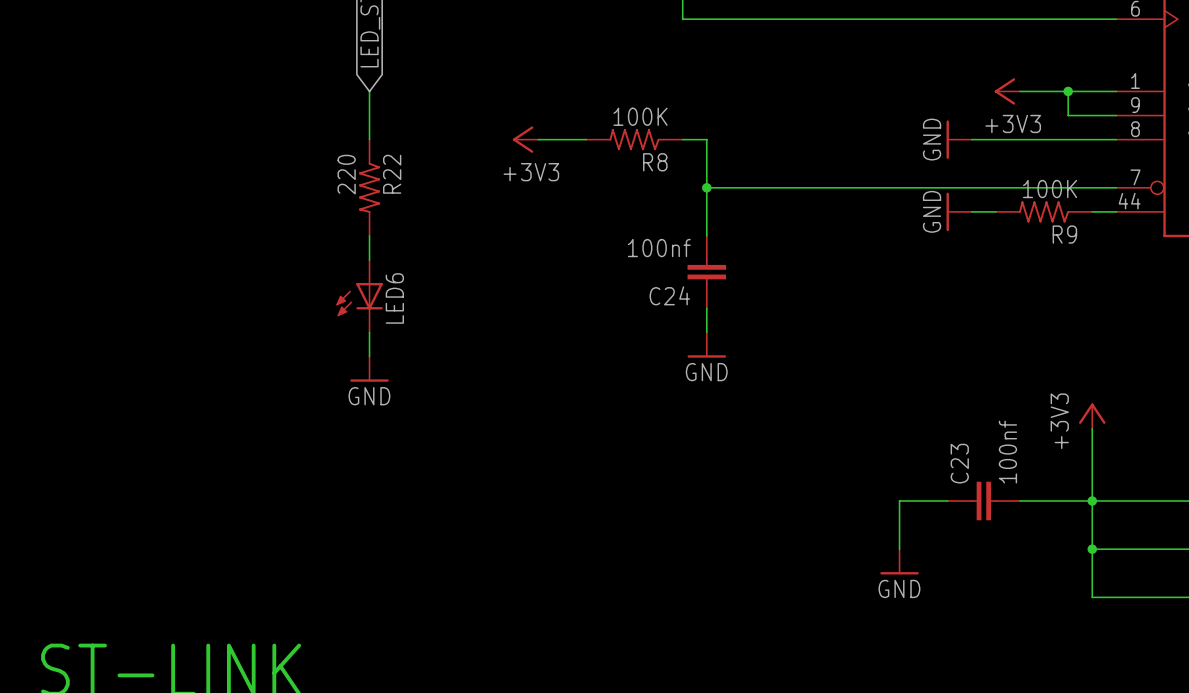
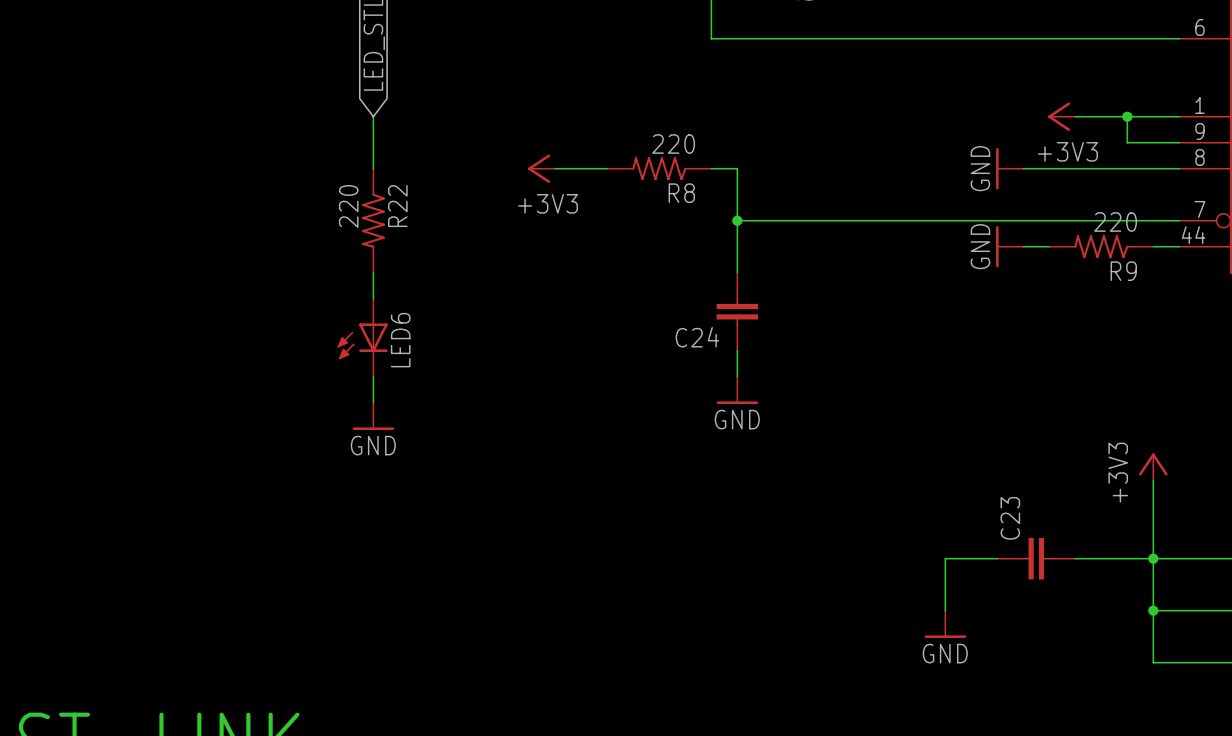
R8 value: 100K (640, 116) -> 220 (673, 144)
R9 value: 100K (1050, 189) -> 220 (1115, 222)
C24 value: 100nf (659, 248) -> none
C23 value: 100nf (1007, 452) -> none

